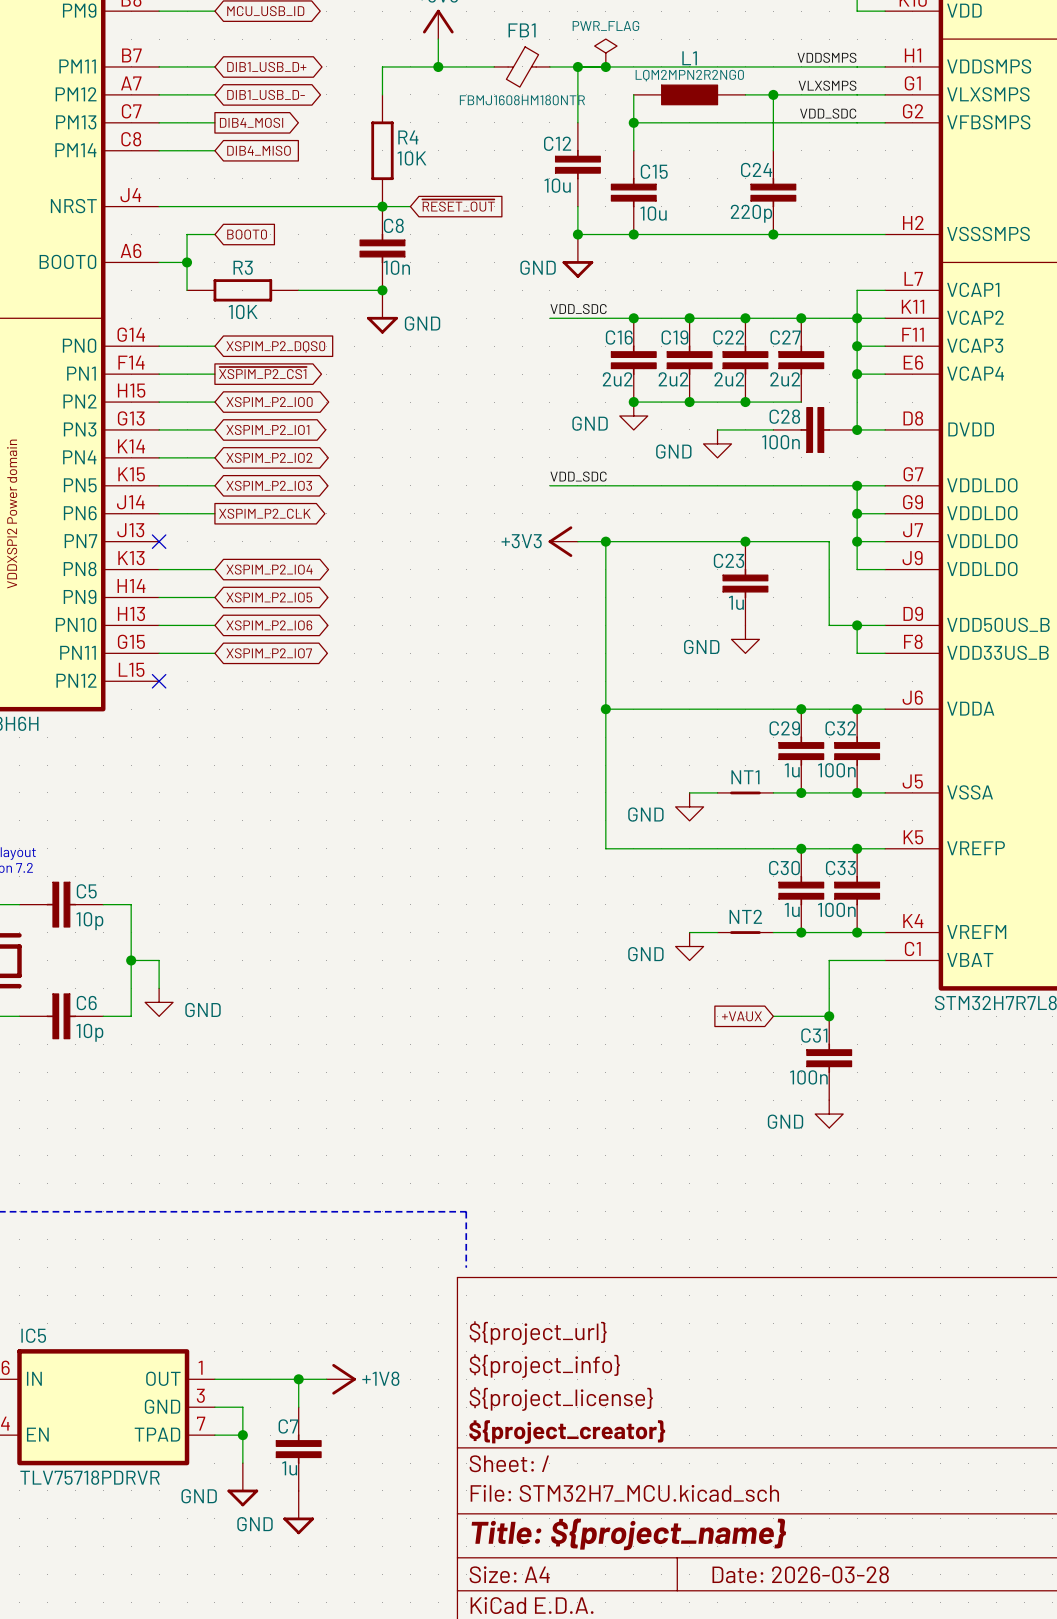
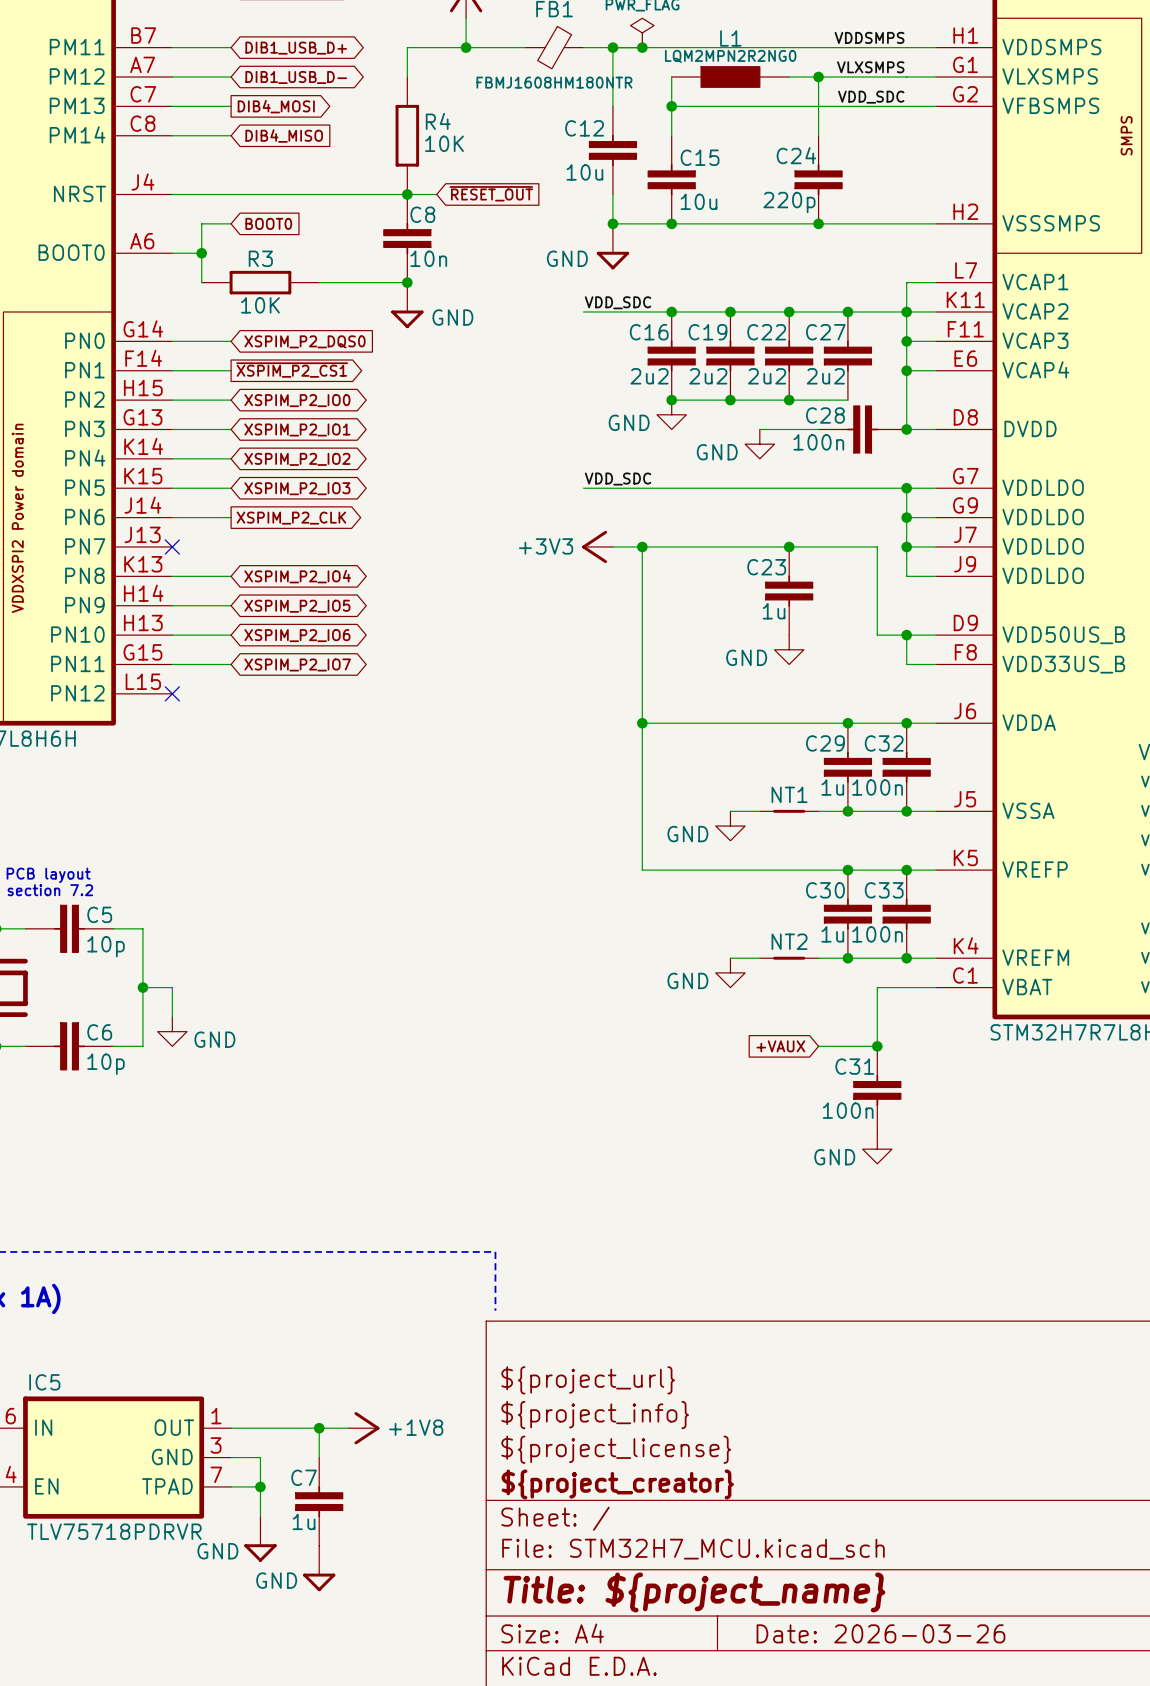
title block: Date: 2026-03-28 (800, 1574) -> Date: 2026-03-26 (880, 1633)

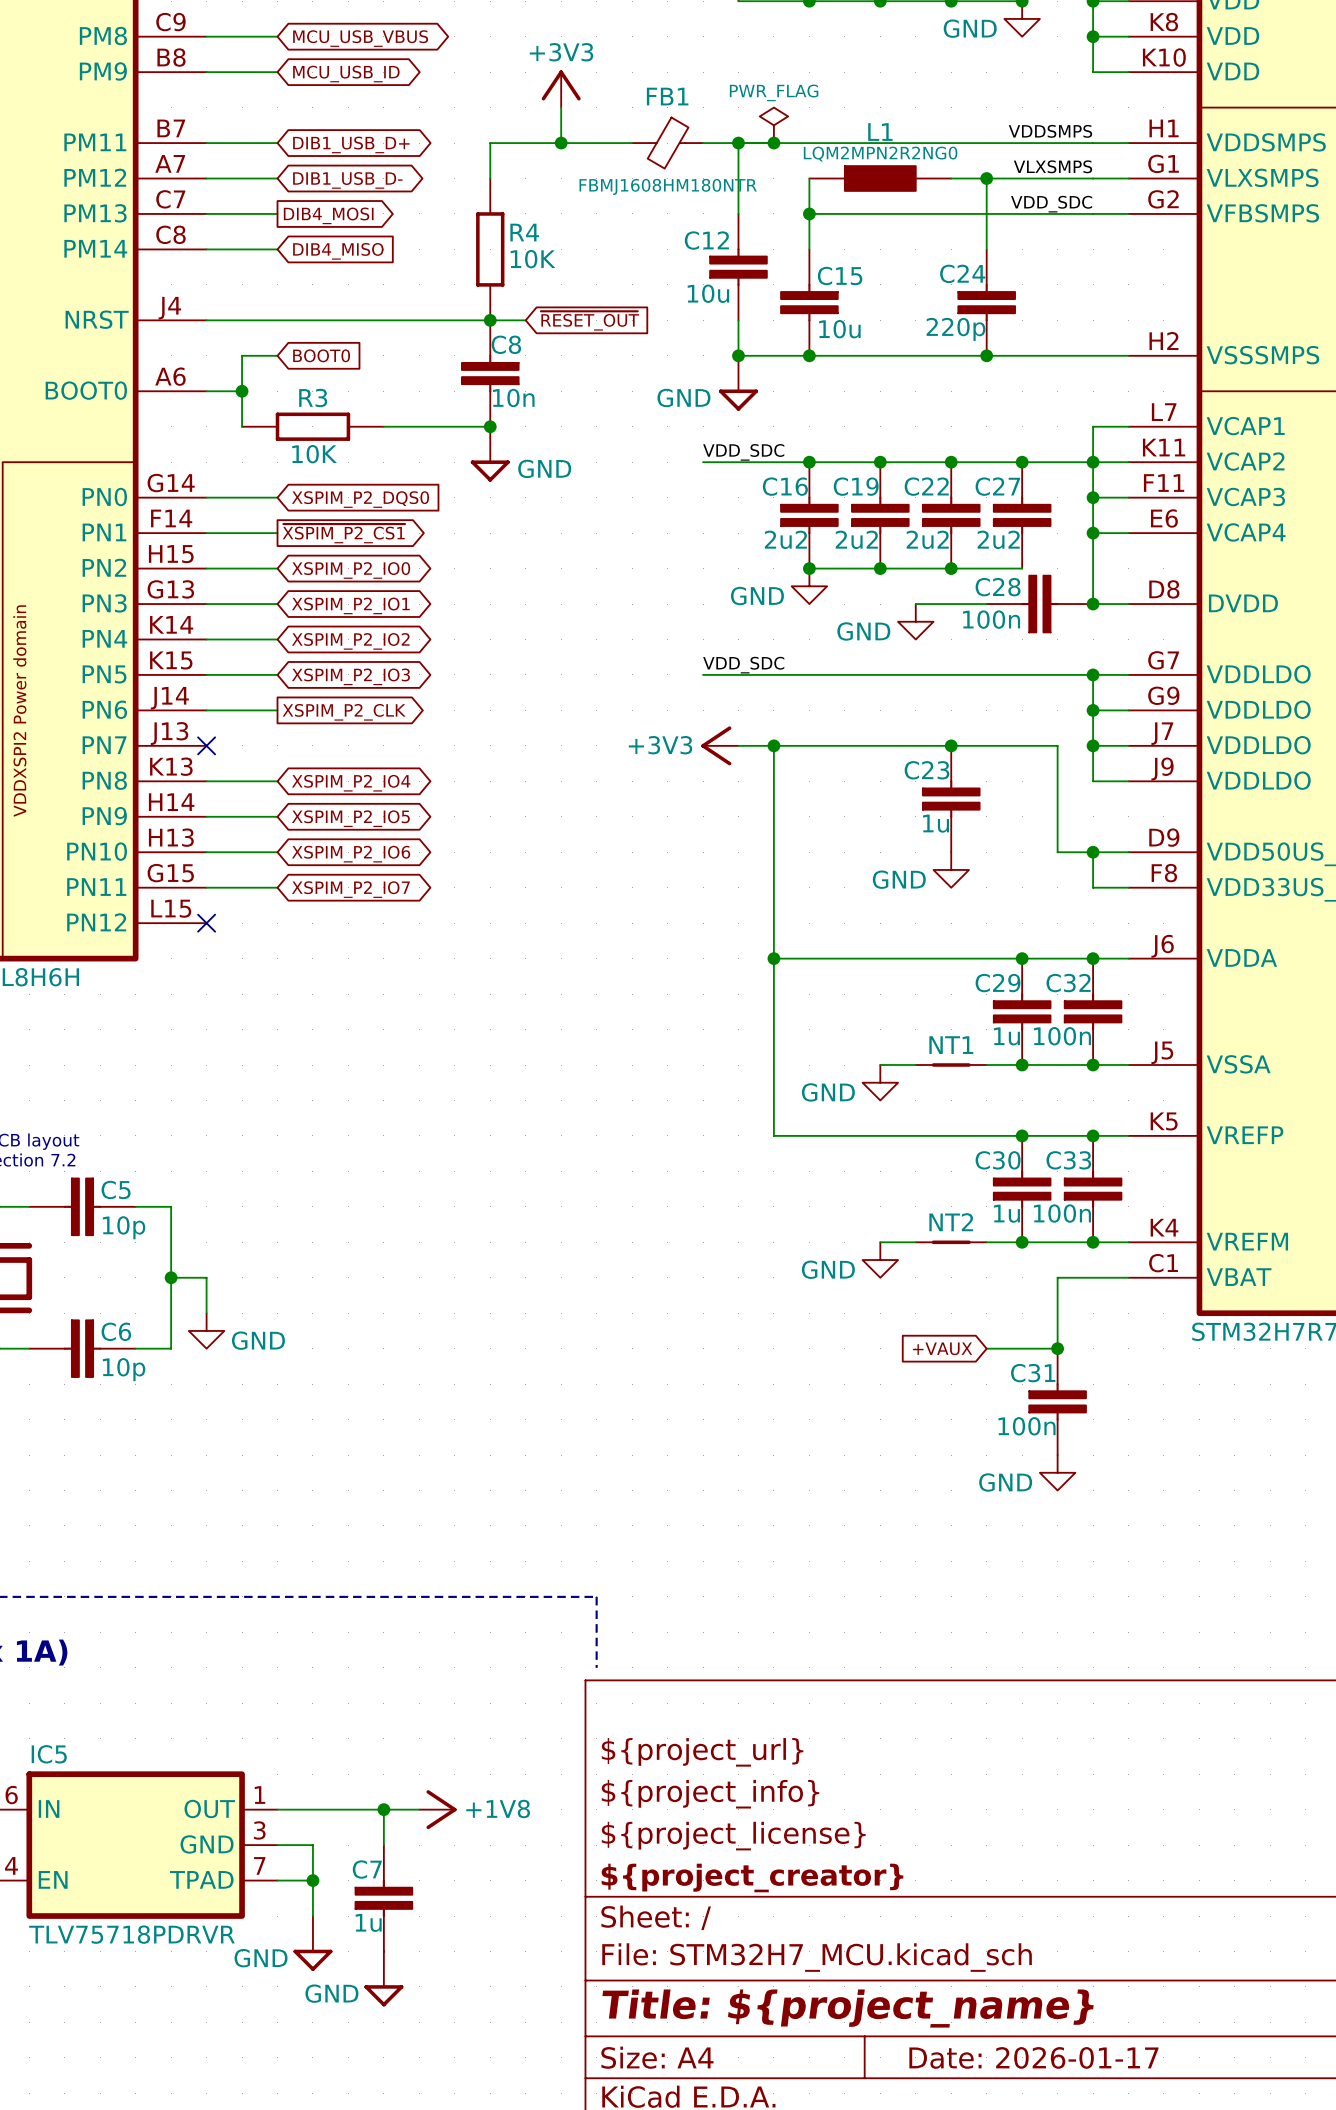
title block: Date: 2026-03-26 (880, 1633) -> Date: 2026-01-17 (1033, 2057)

